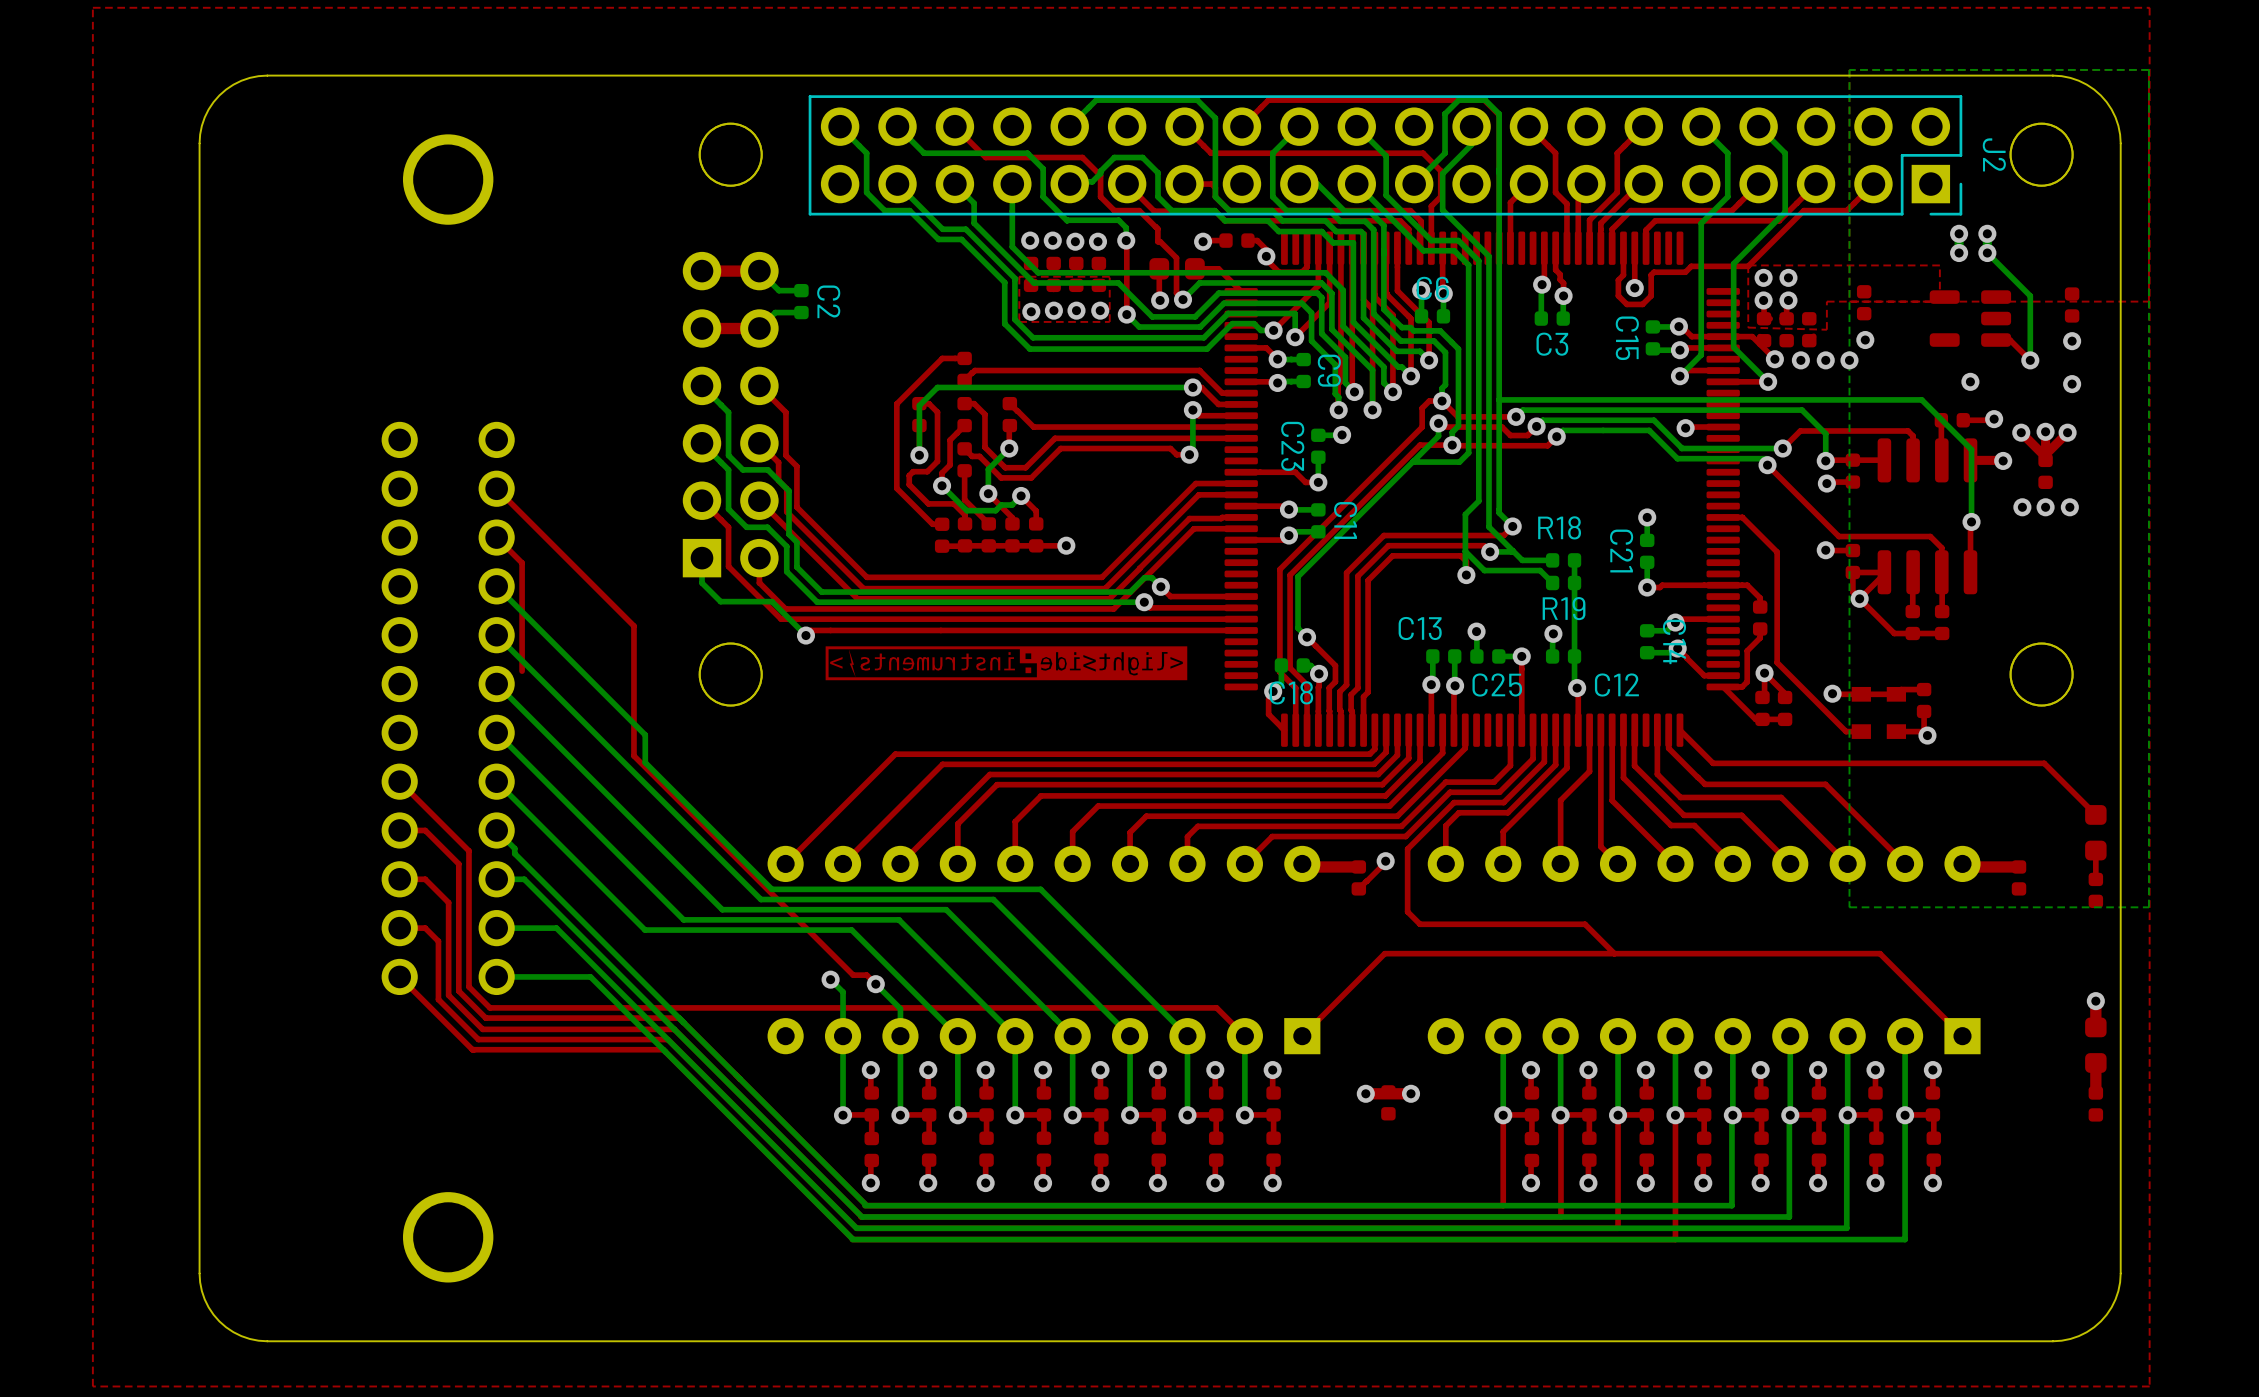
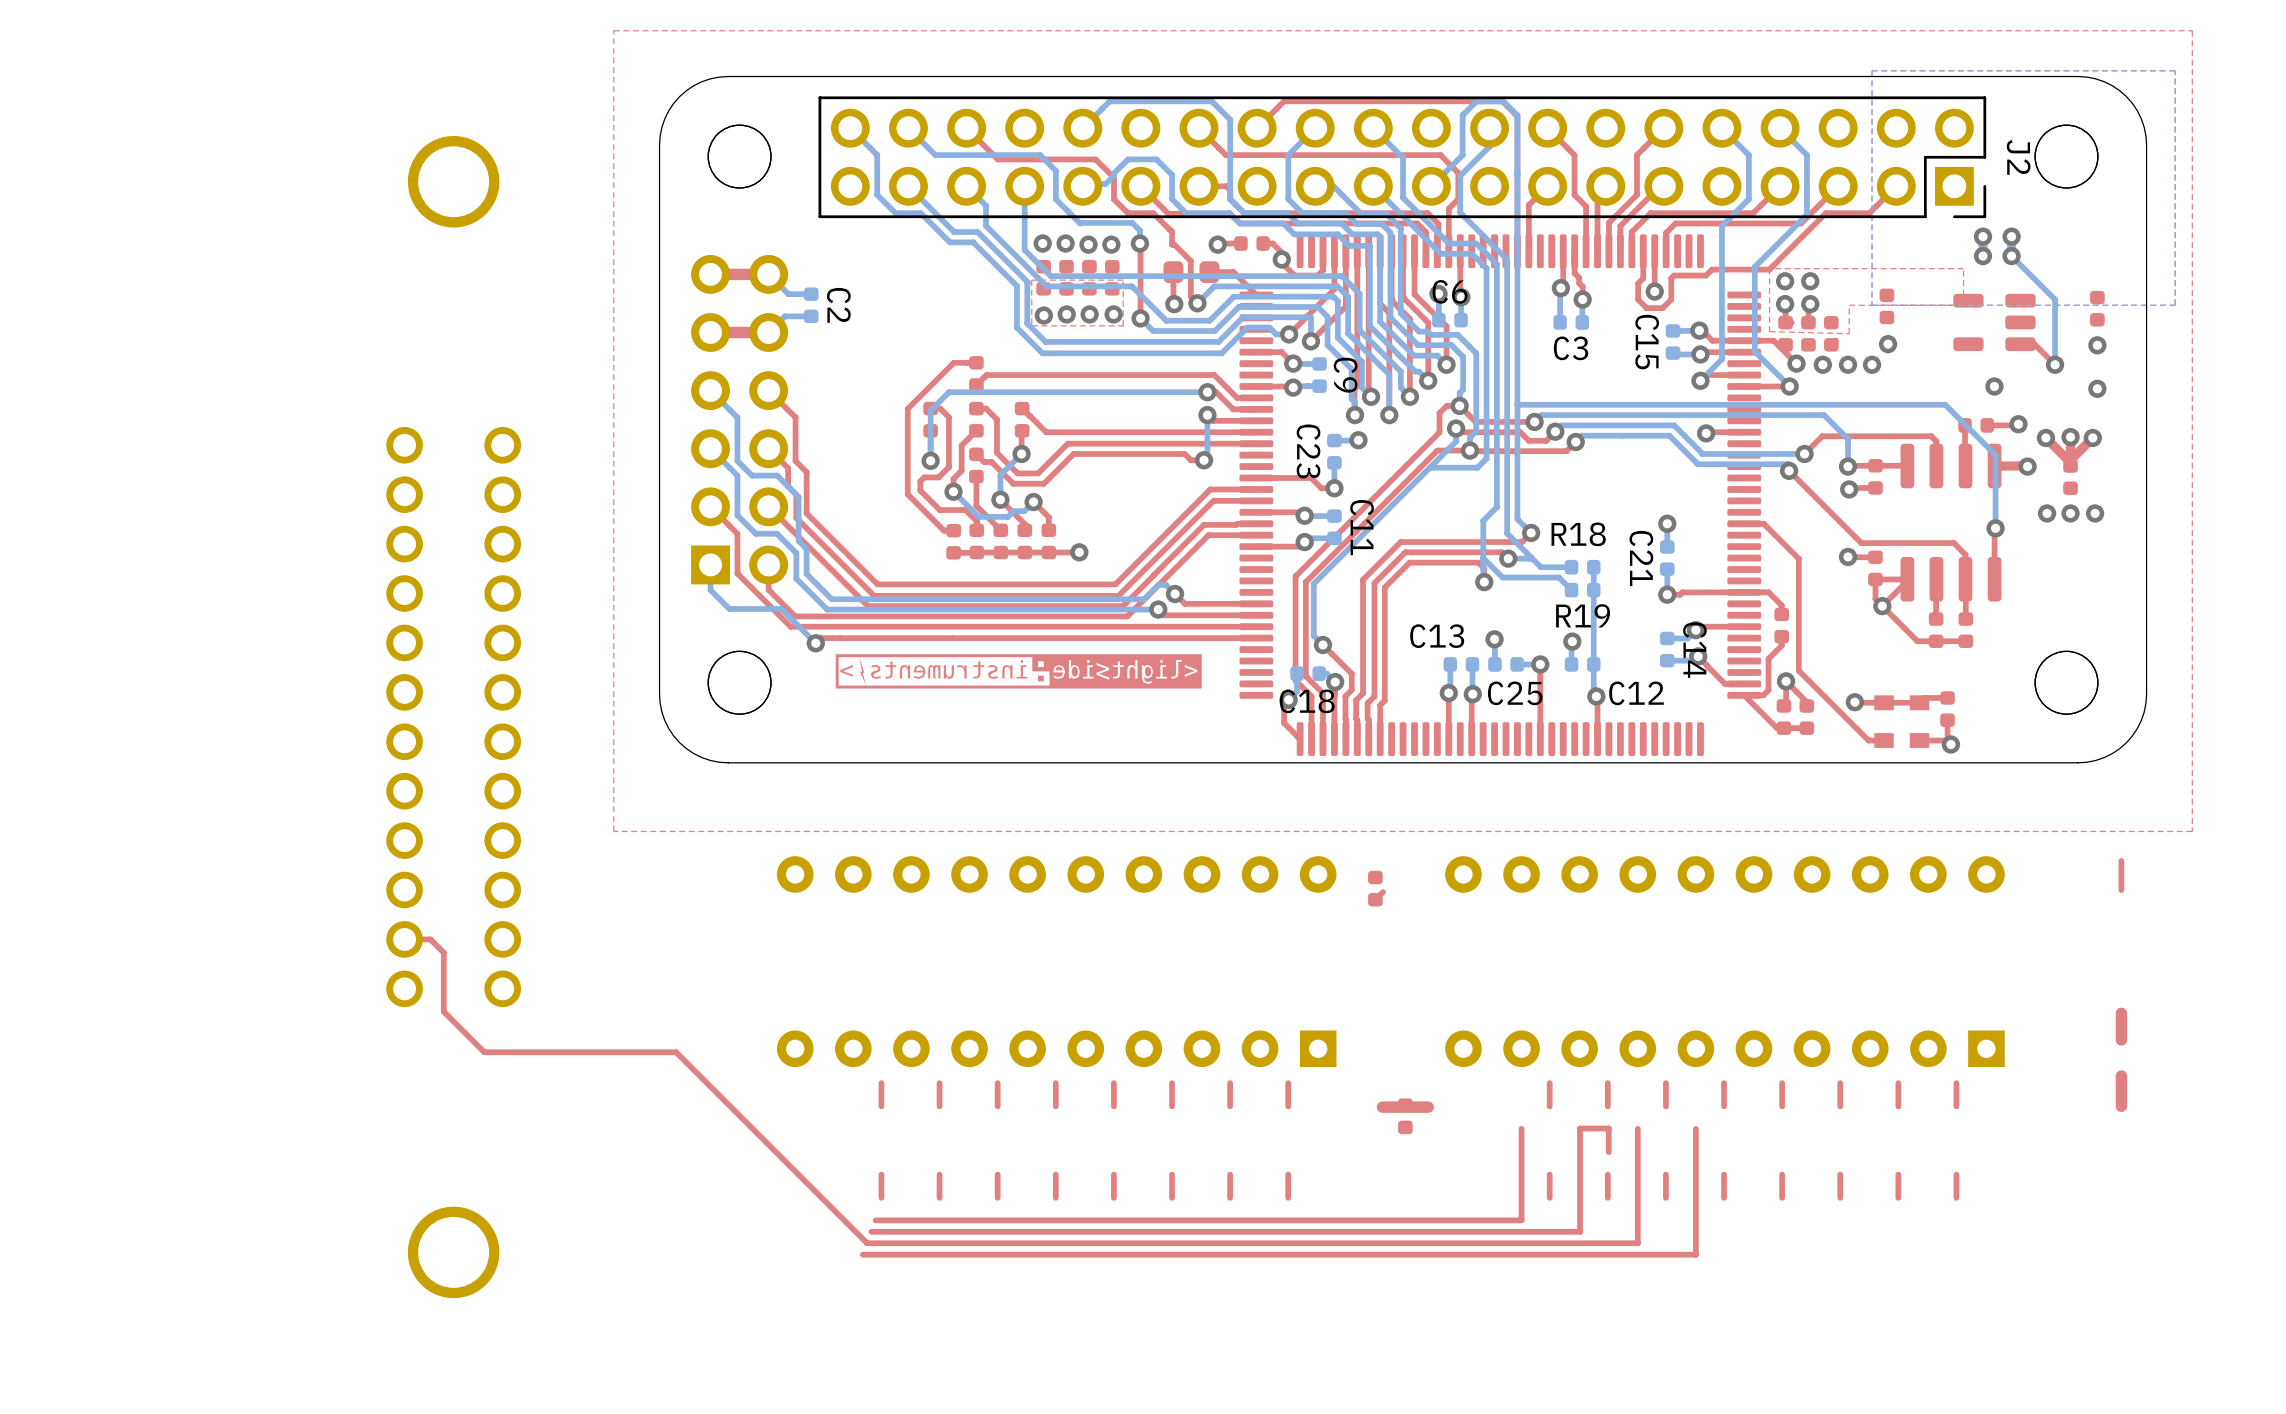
top zone outline: (2149, 7) (2149, 1386) (92, 1386) (92, 7) (2149, 7) -> none
top zone outline: none -> (2192, 30) (2192, 831) (613, 831) (613, 30) (2192, 30)
board edge: (719, 75) (258, 76) (241, 80) (226, 89) (213, 102) (204, 117) (199, 143) (199, 1273) (201, 1291) (213, 1314) (226, 1327) (241, 1336) (267, 1341) (2052, 1341) (2078, 1336) (2100, 1321) (2111, 1307) (2118, 1291) (2120, 1273) (2120, 685) -> (728, 76) (701, 81) (679, 96) (664, 118) (659, 145) (660, 703) (664, 720) (673, 735) (686, 748) (701, 757) (728, 762) (2077, 762) (2104, 757) (2126, 742) (2141, 720) (2146, 694)
bottom zone outline: (2148, 301) (2148, 907) (1849, 907) (1849, 301) -> (2175, 305) (1872, 305)
top track: (496, 488) (633, 626) (633, 755) (853, 975) (866, 975) (875, 984) -> none
top track: (496, 537) (522, 562) (522, 671) -> none
bottom track: (496, 586) (645, 734) (645, 762) (771, 889) (1040, 889) (1187, 1036) (1187, 1115) -> none
bottom track: (496, 635) (760, 899) (993, 899) (1130, 1036) (1130, 1115) -> none
bottom track: (496, 684) (722, 909) (946, 909) (1072, 1036) (1072, 1115) -> none
top track: (1374, 730) (1374, 749) (1369, 754) (895, 754) (785, 863) -> none
top track: (1386, 730) (1386, 752) (1373, 764) (942, 764) (843, 863) -> none
top track: (1397, 730) (1397, 755) (1378, 774) (989, 774) (900, 863) -> none
top track: (1408, 730) (1408, 758) (1382, 784) (997, 784) (957, 824) (957, 863) -> none
top track: (1420, 730) (1420, 761) (1385, 795) (1041, 795) (1015, 821) (1015, 863) -> none
top track: (1442, 730) (1442, 753) (1389, 806) (1098, 806) (1072, 831) (1072, 863) -> none
top track: (1465, 730) (1465, 748) (1397, 816) (1146, 816) (1130, 832) (1130, 863) -> none
top track: (1510, 730) (1510, 765) (1493, 782) (1445, 782) (1401, 826) (1197, 826) (1187, 836) (1187, 863) -> none
top track: (1533, 730) (1533, 758) (1499, 792) (1450, 792) (1405, 836) (1272, 836) (1244, 863) -> none
top track: (1544, 730) (1544, 761) (1503, 802) (1454, 802) (1407, 849) (1407, 911) (1420, 924) (1585, 924) (1614, 953) -> none
top track: (1555, 730) (1555, 764) (1507, 812) (1458, 812) (1445, 825) (1445, 863) -> none
top track: (1566, 730) (1566, 768) (1503, 831) (1503, 863) -> none
top track: (1589, 730) (1589, 771) (1560, 800) (1560, 863) -> none
top track: (1600, 730) (1600, 846) (1618, 863) -> none
top track: (1612, 730) (1612, 800) (1675, 863) -> none
top track: (1623, 730) (1623, 777) (1671, 825) (1694, 825) (1732, 863) -> none
top track: (1634, 730) (1634, 765) (1684, 815) (1741, 815) (1790, 863) -> none
top track: (1657, 730) (1657, 774) (1680, 797) (1781, 797) (1847, 863) -> none
top track: (1668, 730) (1668, 748) (1697, 777) -> none
top track: (1679, 730) (1713, 763) (2044, 763) (2095, 814) -> none
bottom track: (496, 732) (683, 919) (898, 919) (1015, 1036) (1015, 1115) -> none
top track: (1698, 777) (1705, 784) (1825, 784) (1905, 863) -> none
top track: (399, 781) (468, 850) (468, 986) (490, 1007) (1216, 1007) (1244, 1036) -> none
bottom track: (496, 781) (645, 930) (851, 930) (957, 1036) (957, 1115) -> none
top track: (399, 830) (425, 830) (458, 864) (458, 991) (485, 1018) (679, 1018) (865, 1203) -> none
bottom track: (496, 830) (514, 848) (514, 853) (865, 1203) -> none
part: (2095, 832) -> none
top track: (1385, 861) (1366, 881) -> none
via: (1385, 861) -> none
top track: (1302, 863) (1305, 866) (1358, 866) -> none
top track: (1962, 863) (1965, 866) (2019, 866) -> none
part: (2019, 877) -> none
top track: (399, 879) (425, 879) (448, 902) (448, 995) (482, 1029) (674, 1029) (861, 1216) -> none
bottom track: (496, 879) (524, 879) (861, 1216) -> none
part: (2095, 890) -> none
bottom track: (496, 928) (556, 928) (856, 1228) (1846, 1228) (1846, 1115) -> none
top track: (399, 976) (472, 1049) (663, 1049) (852, 1238) -> none
bottom track: (496, 976) (590, 976) (852, 1238) -> none
bottom track: (830, 979) (843, 992) (843, 1115) -> none
via: (830, 979) -> none
bottom track: (875, 984) (900, 1008) (900, 1115) -> none
via: (875, 984) -> none
via: (2095, 1001) -> none
bottom track: (1244, 1036) (1244, 1115) -> none
bottom track: (1503, 1036) (1503, 1115) -> none
bottom track: (1560, 1036) (1560, 1115) -> none
bottom track: (1618, 1036) (1618, 1115) -> none
bottom track: (1675, 1036) (1675, 1115) -> none
bottom track: (1732, 1036) (1732, 1115) -> none
bottom track: (1790, 1036) (1790, 1115) -> none
bottom track: (1847, 1036) (1847, 1115) -> none
bottom track: (1905, 1036) (1905, 1239) (852, 1239) -> none
top track: (1962, 1036) (1880, 953) (1384, 953) (1302, 1036) -> none
part: (2095, 1045) -> none
via: (870, 1070) -> none
via: (928, 1070) -> none
via: (985, 1070) -> none
via: (1043, 1070) -> none
via: (1100, 1070) -> none
via: (1157, 1070) -> none
via: (1215, 1070) -> none
via: (1272, 1070) -> none
via: (1531, 1070) -> none
via: (1588, 1070) -> none
via: (1645, 1070) -> none
via: (1703, 1070) -> none
via: (1760, 1070) -> none
via: (1818, 1070) -> none
via: (1875, 1070) -> none
via: (1932, 1070) -> none
via: (1365, 1093) -> none
via: (1411, 1093) -> none
part: (871, 1103) -> none
part: (929, 1103) -> none
part: (986, 1103) -> none
part: (1043, 1103) -> none
part: (1101, 1103) -> none
part: (1158, 1103) -> none
part: (1216, 1103) -> none
part: (1273, 1103) -> none
part: (1531, 1103) -> none
part: (1589, 1103) -> none
part: (1646, 1103) -> none
part: (1704, 1103) -> none
part: (1761, 1103) -> none
part: (1818, 1103) -> none
part: (1875, 1103) -> none
part: (1932, 1103) -> none
part: (2095, 1103) -> none
top track: (843, 1114) (871, 1114) (871, 1137) -> none
top track: (900, 1114) (929, 1114) (929, 1138) -> none
top track: (958, 1114) (986, 1114) (986, 1138) -> none
top track: (1015, 1114) (1043, 1114) (1043, 1138) -> none
top track: (1073, 1114) (1101, 1114) (1101, 1138) -> none
top track: (1130, 1114) (1158, 1114) (1158, 1138) -> none
top track: (1187, 1114) (1216, 1114) (1216, 1138) -> none
top track: (1503, 1114) (1531, 1114) (1531, 1138) -> none
top track: (1618, 1114) (1646, 1114) (1646, 1138) -> none
top track: (1675, 1114) (1704, 1114) (1704, 1138) -> none
top track: (1733, 1114) (1761, 1114) (1761, 1138) -> none
bottom track: (1789, 1114) (1789, 1216) (862, 1216) -> none
top track: (1790, 1114) (1818, 1114) (1818, 1138) -> none
top track: (1848, 1114) (1876, 1114) (1876, 1138) -> none
via: (843, 1115) -> none
via: (900, 1115) -> none
via: (957, 1115) -> none
via: (1015, 1115) -> none
via: (1072, 1115) -> none
via: (1130, 1115) -> none
via: (1187, 1115) -> none
top track: (1244, 1115) (1273, 1114) (1273, 1138) -> none
via: (1244, 1115) -> none
via: (1503, 1115) -> none
via: (1560, 1115) -> none
via: (1618, 1115) -> none
via: (1675, 1115) -> none
bottom track: (1731, 1115) (1731, 1205) (865, 1205) -> none
via: (1732, 1115) -> none
via: (1790, 1115) -> none
via: (1847, 1115) -> none
top track: (1905, 1115) (1933, 1114) (1933, 1138) -> none
via: (1905, 1115) -> none
part: (871, 1149) -> none
part: (929, 1149) -> none
part: (986, 1149) -> none
part: (1043, 1149) -> none
part: (1101, 1149) -> none
part: (1158, 1149) -> none
part: (1216, 1149) -> none
part: (1273, 1149) -> none
part: (1531, 1149) -> none
part: (1589, 1149) -> none
part: (1646, 1149) -> none
part: (1704, 1149) -> none
part: (1761, 1149) -> none
part: (1818, 1149) -> none
part: (1876, 1149) -> none
part: (1933, 1149) -> none
via: (870, 1183) -> none
via: (928, 1183) -> none
via: (985, 1183) -> none
via: (1043, 1183) -> none
via: (1100, 1183) -> none
via: (1157, 1183) -> none
via: (1215, 1183) -> none
via: (1272, 1183) -> none
via: (1531, 1183) -> none
via: (1588, 1183) -> none
via: (1645, 1183) -> none
via: (1703, 1183) -> none
via: (1760, 1183) -> none
via: (1818, 1183) -> none
via: (1875, 1183) -> none
via: (1932, 1183) -> none

